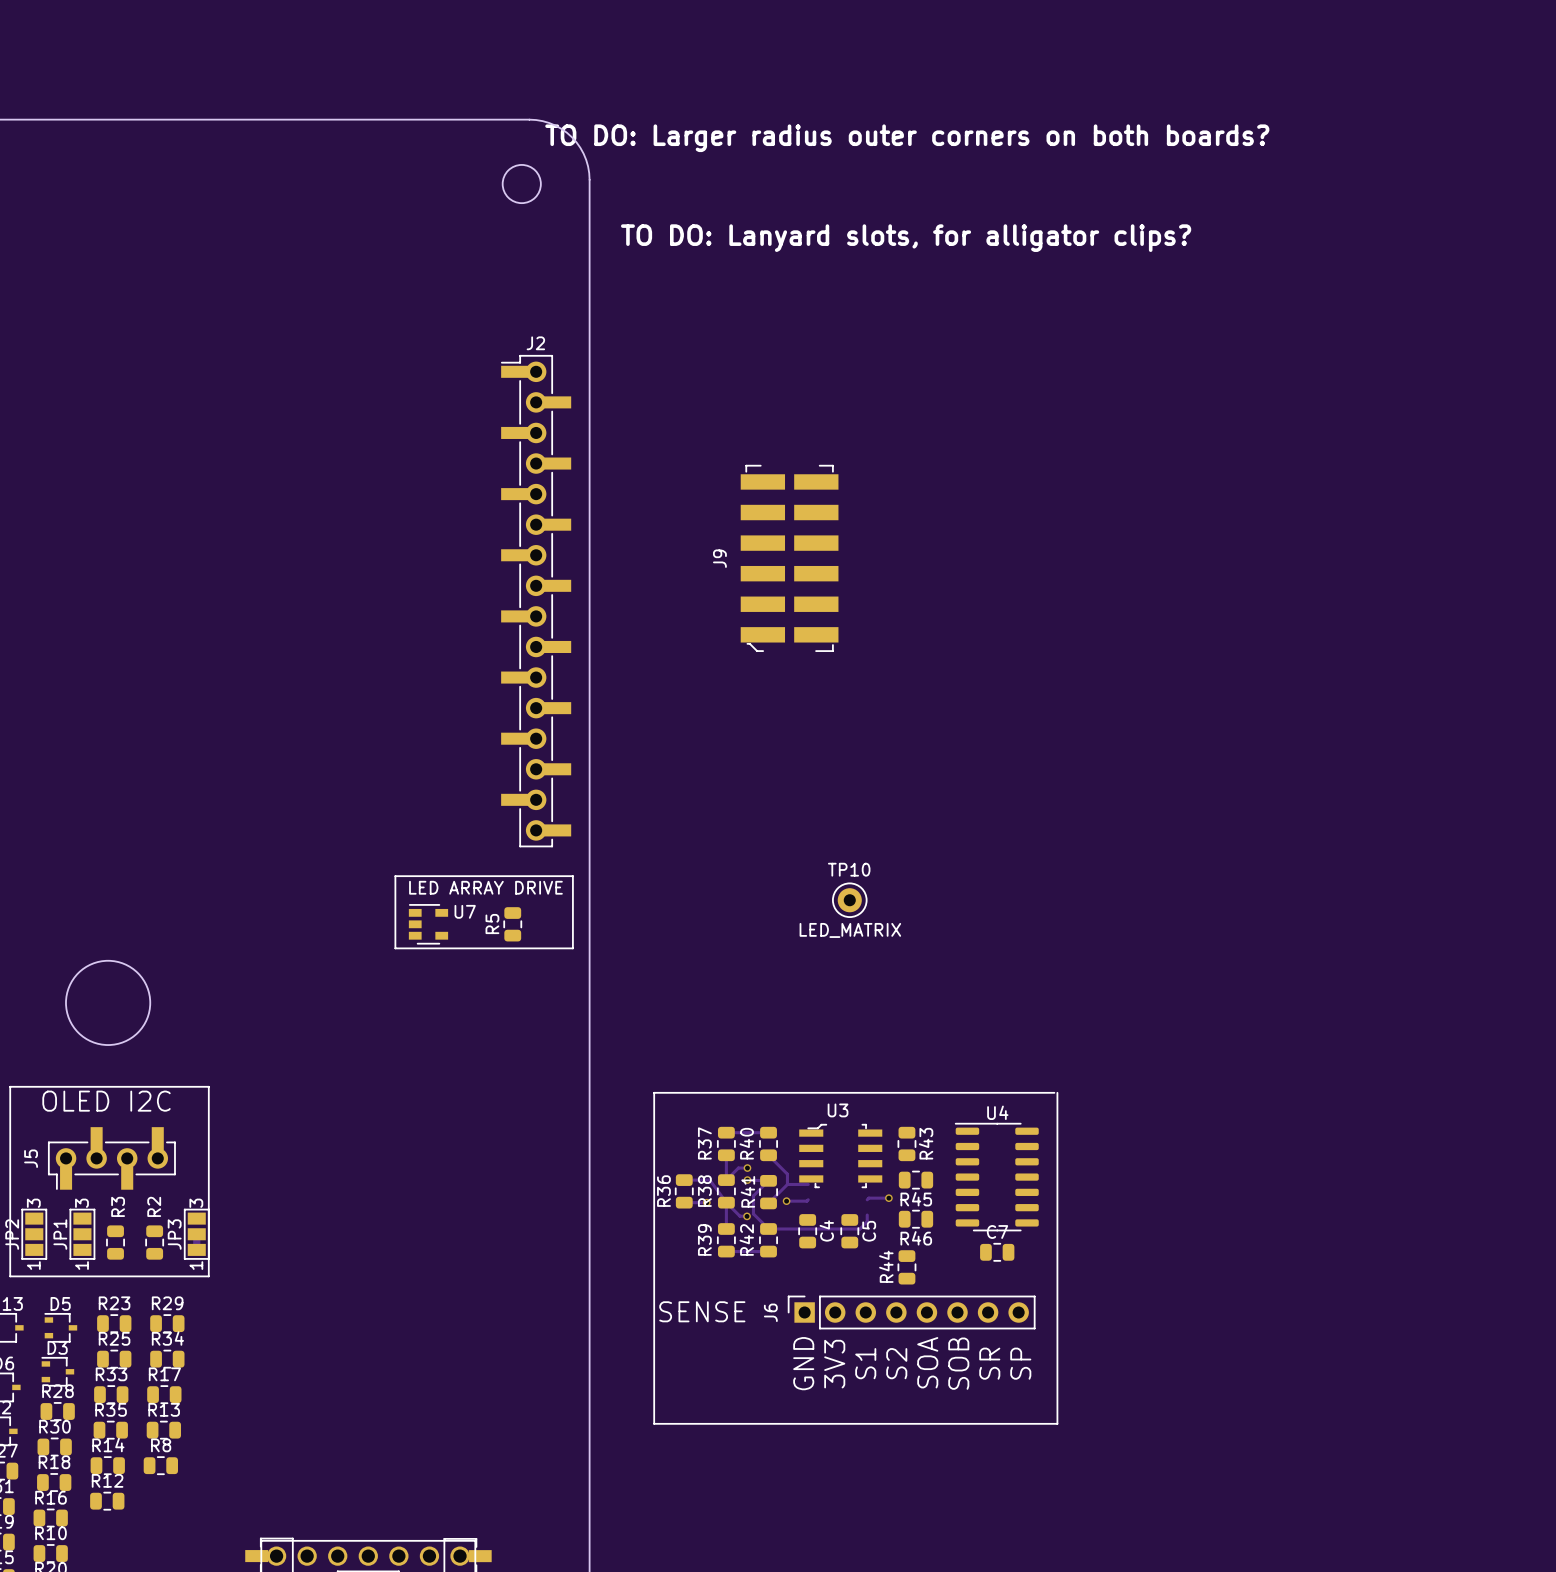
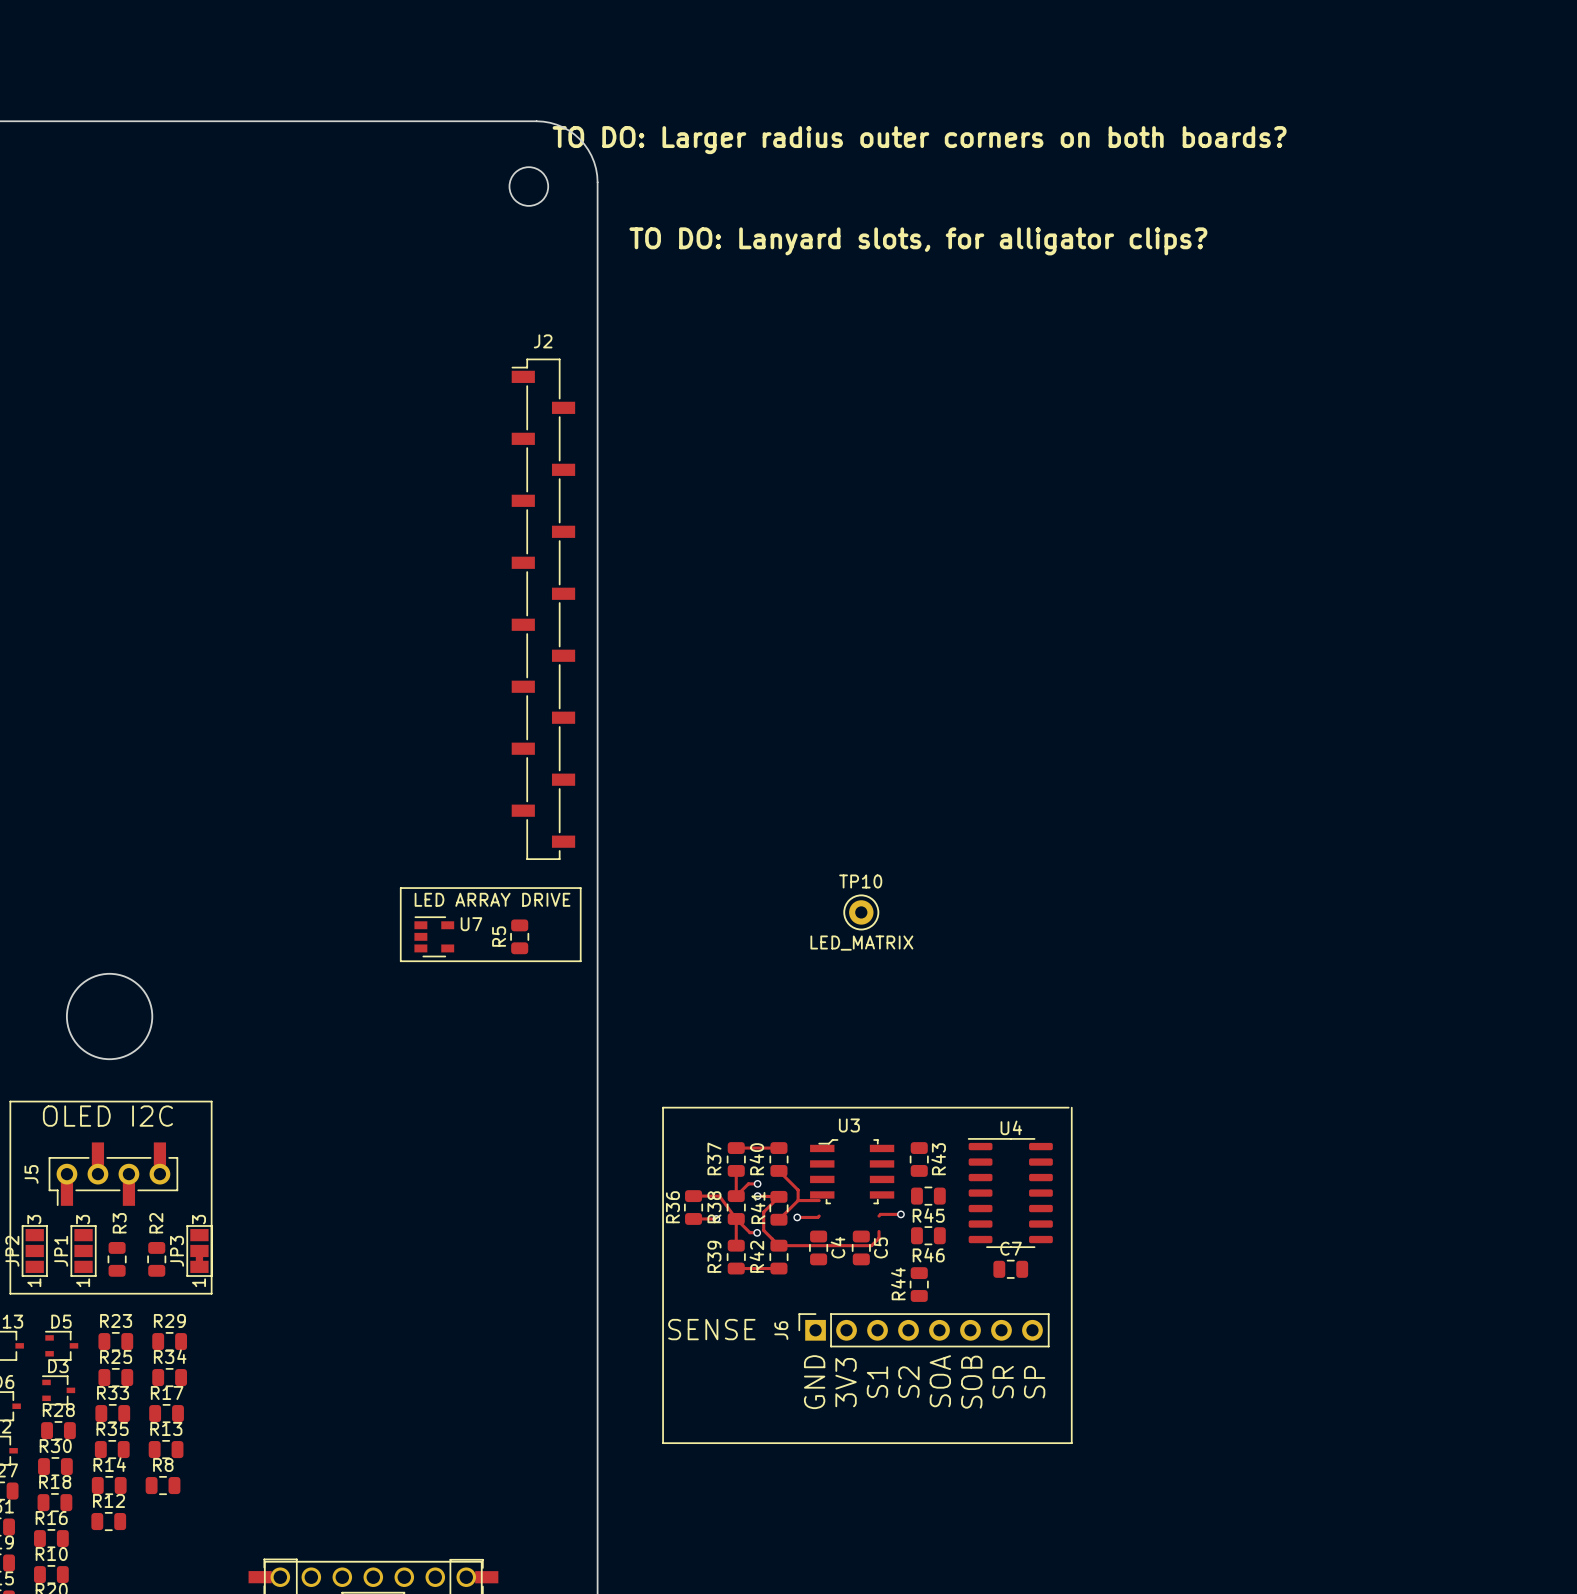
J2 footprint: [501, 355, 572, 848] -> [511, 358, 576, 860]
J9: (789, 558) -> none

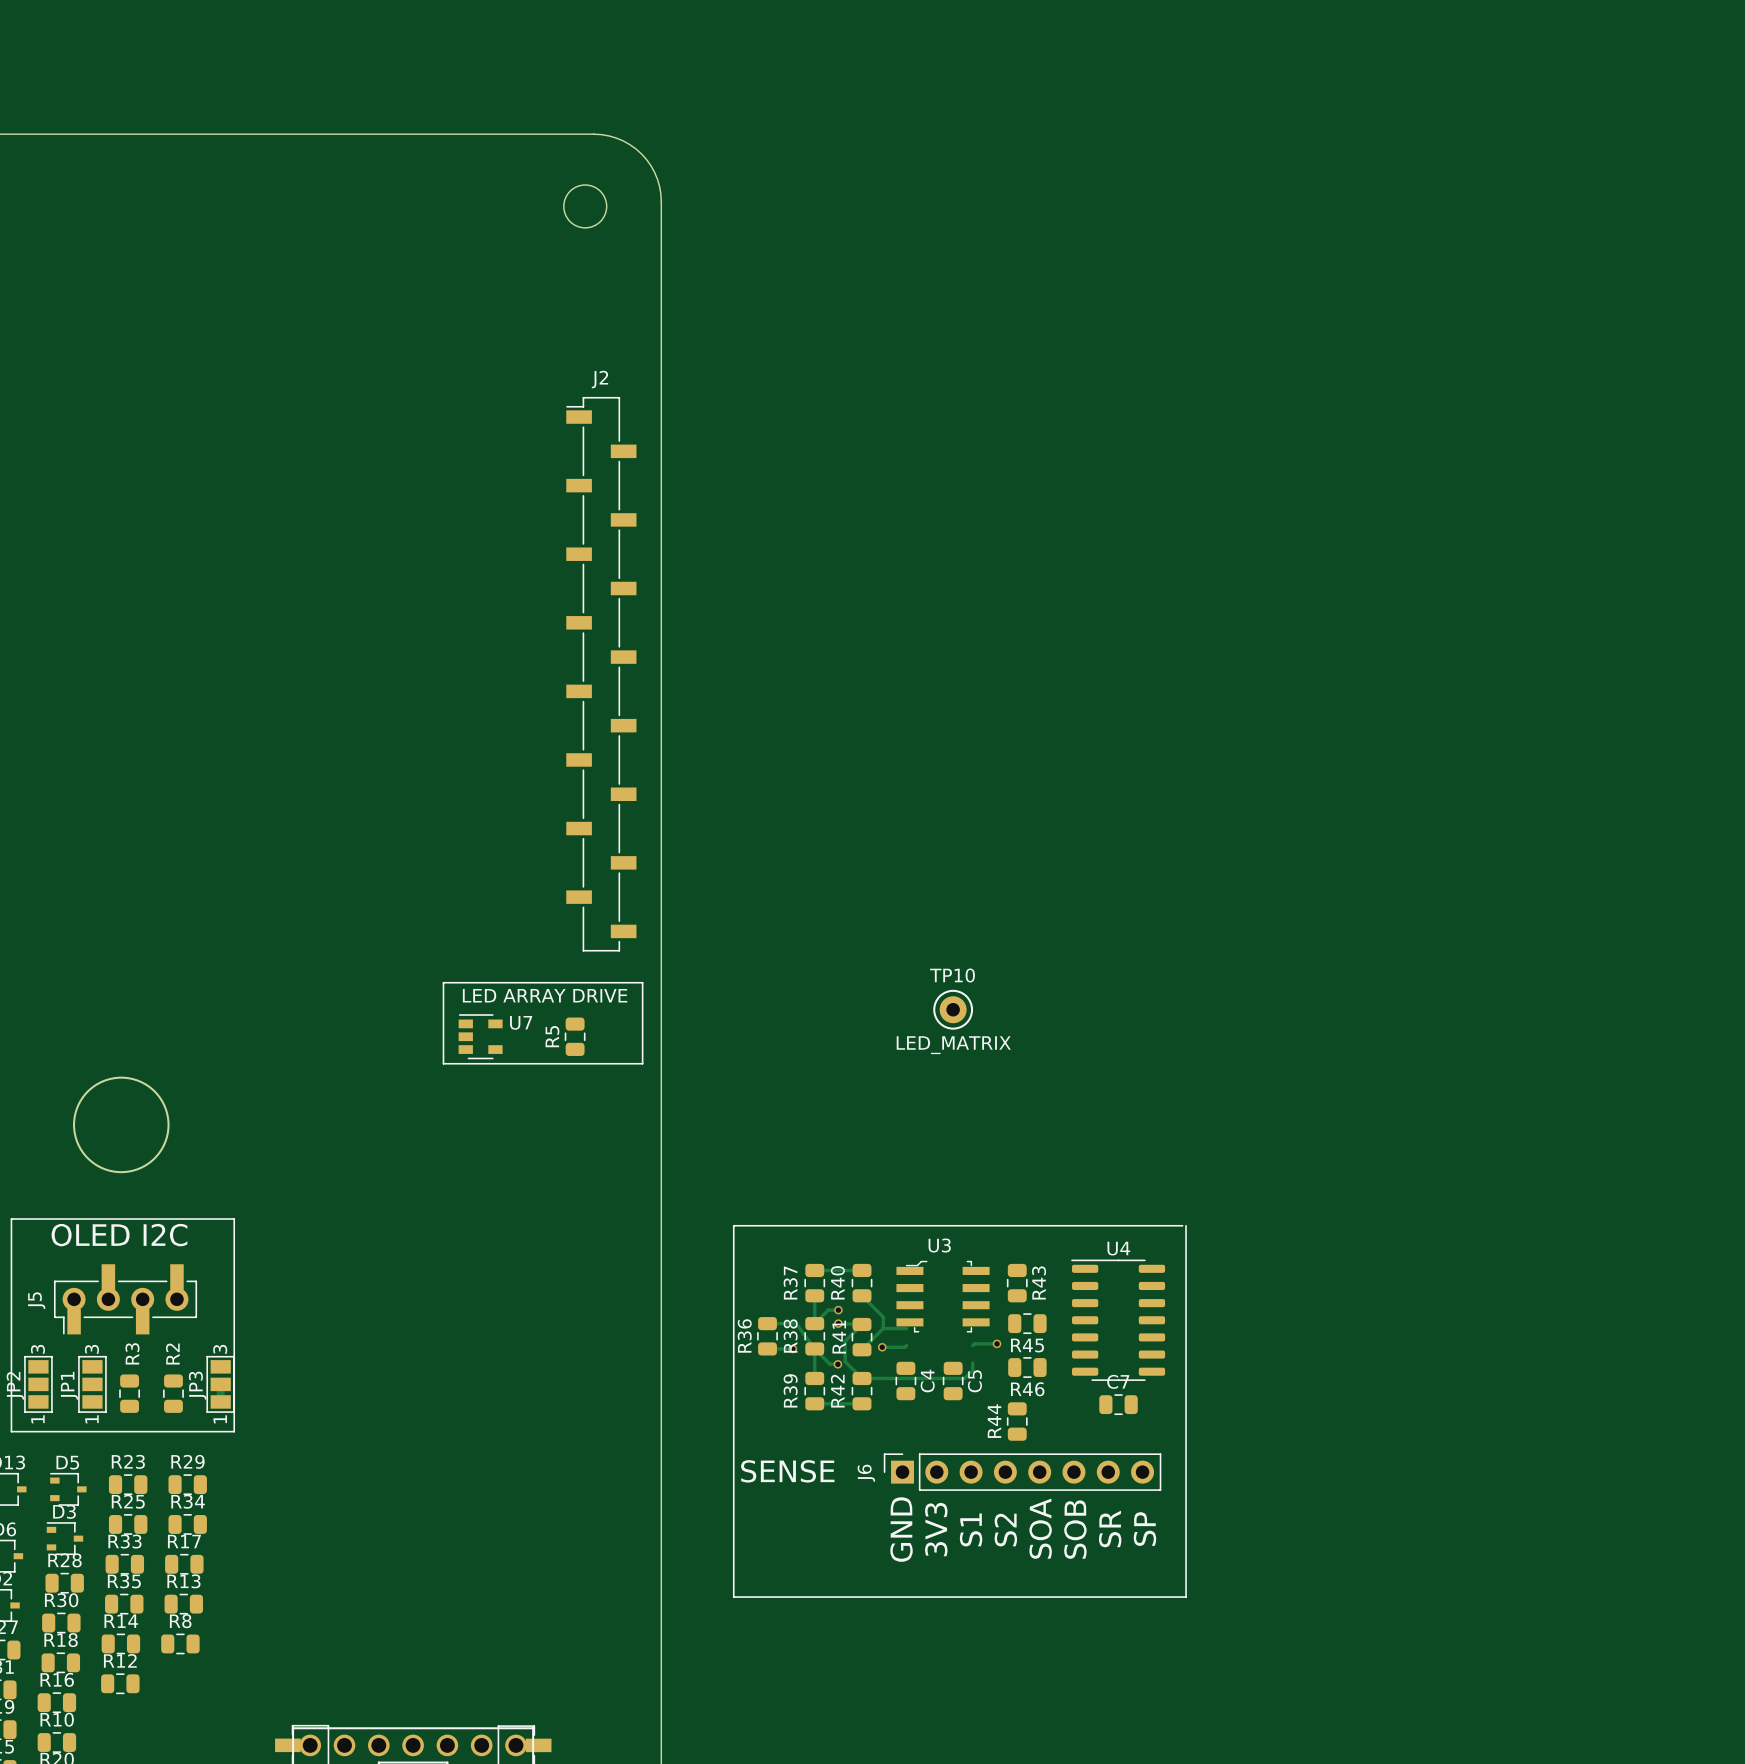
text: TO DO: Larger radius outer corners on both boards? (919, 140) -> none
text: TO DO: Lanyard slots, for alligator clips? (918, 241) -> none

